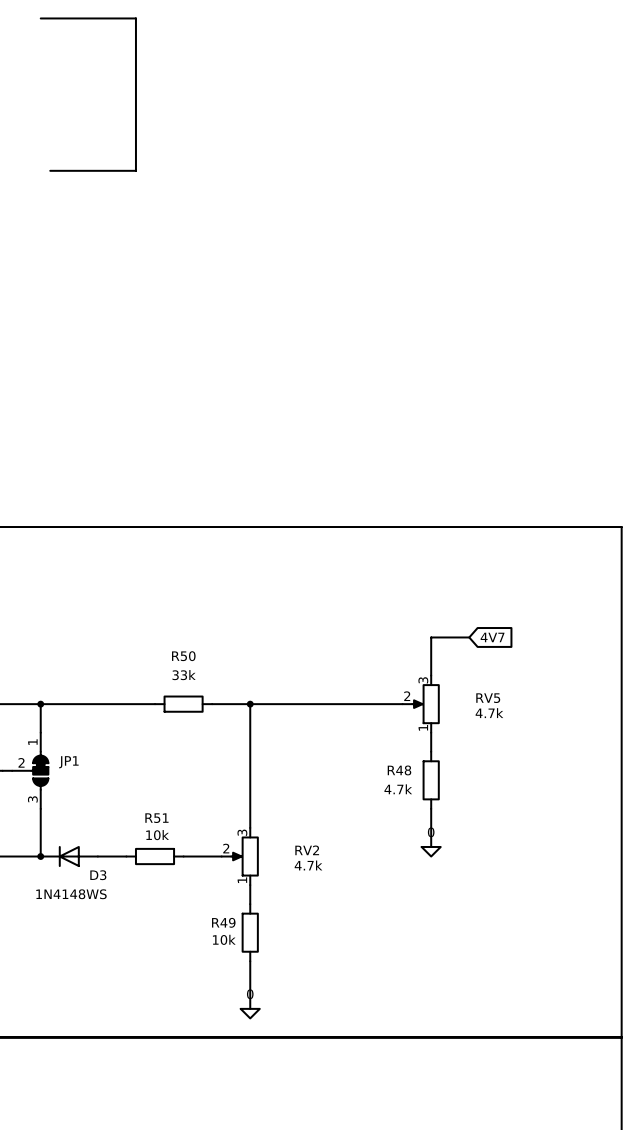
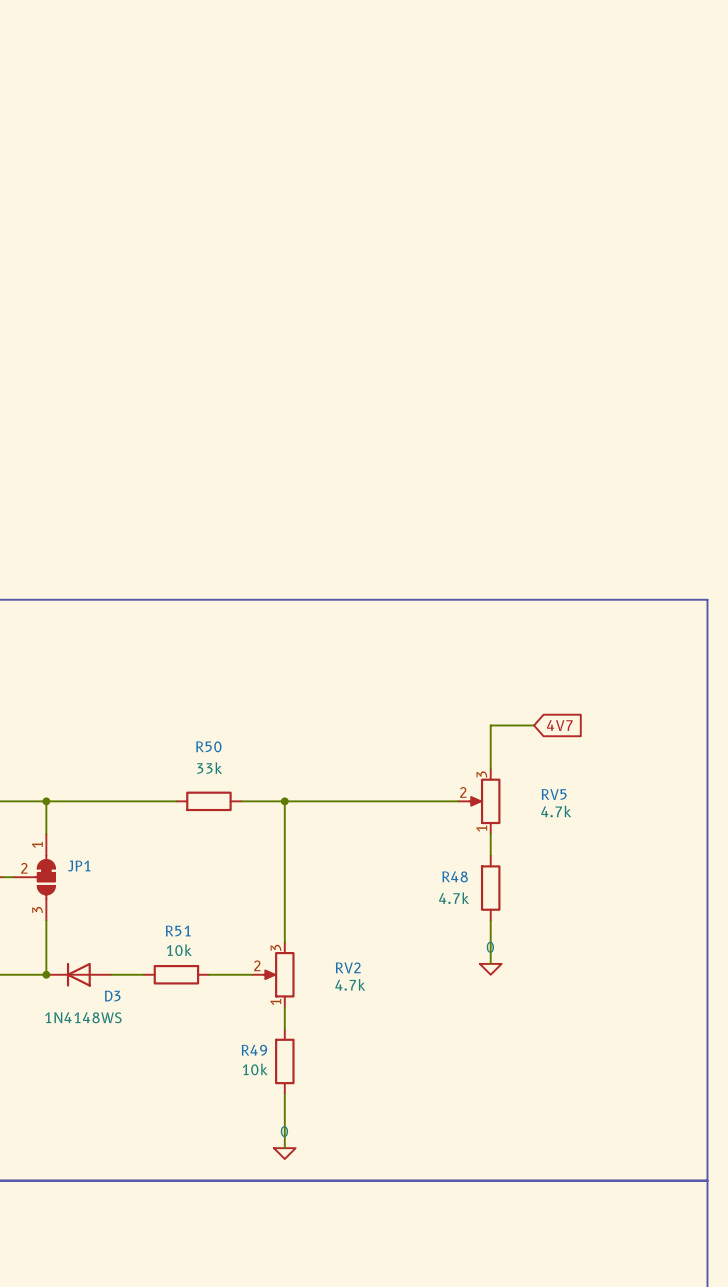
wire: (40, 18) (135, 18) (135, 170) (50, 170) -> none

